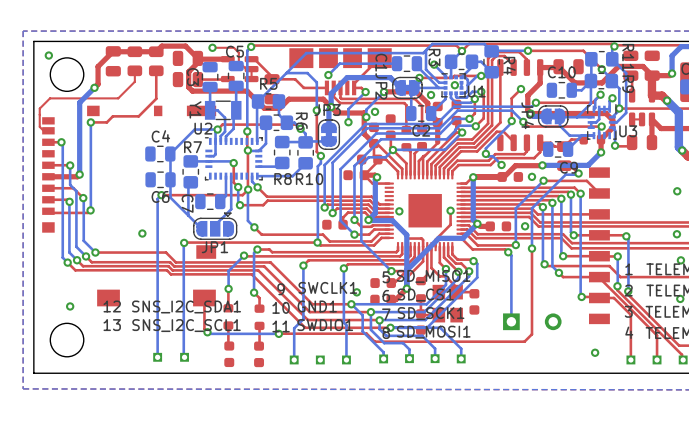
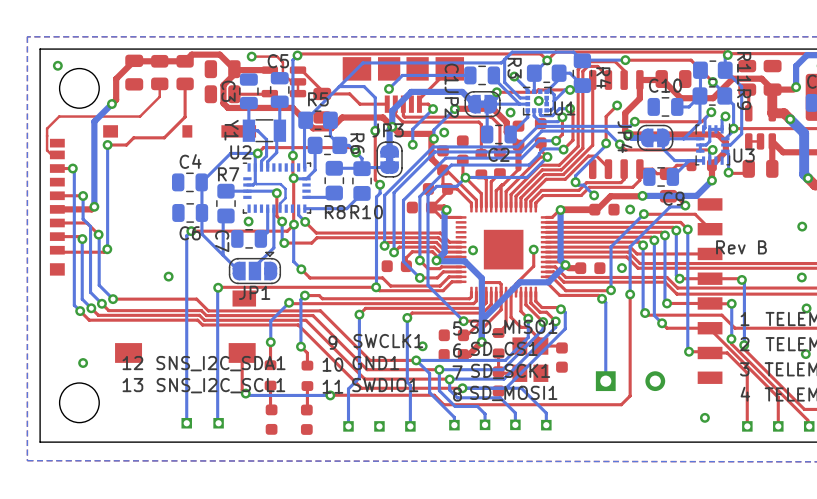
bottom track: none -> (255, 182) (280, 184) (285, 188) (285, 198) (280, 203) (280, 208)
via: none -> (248, 221)
text: none -> Rev B (741, 247)

